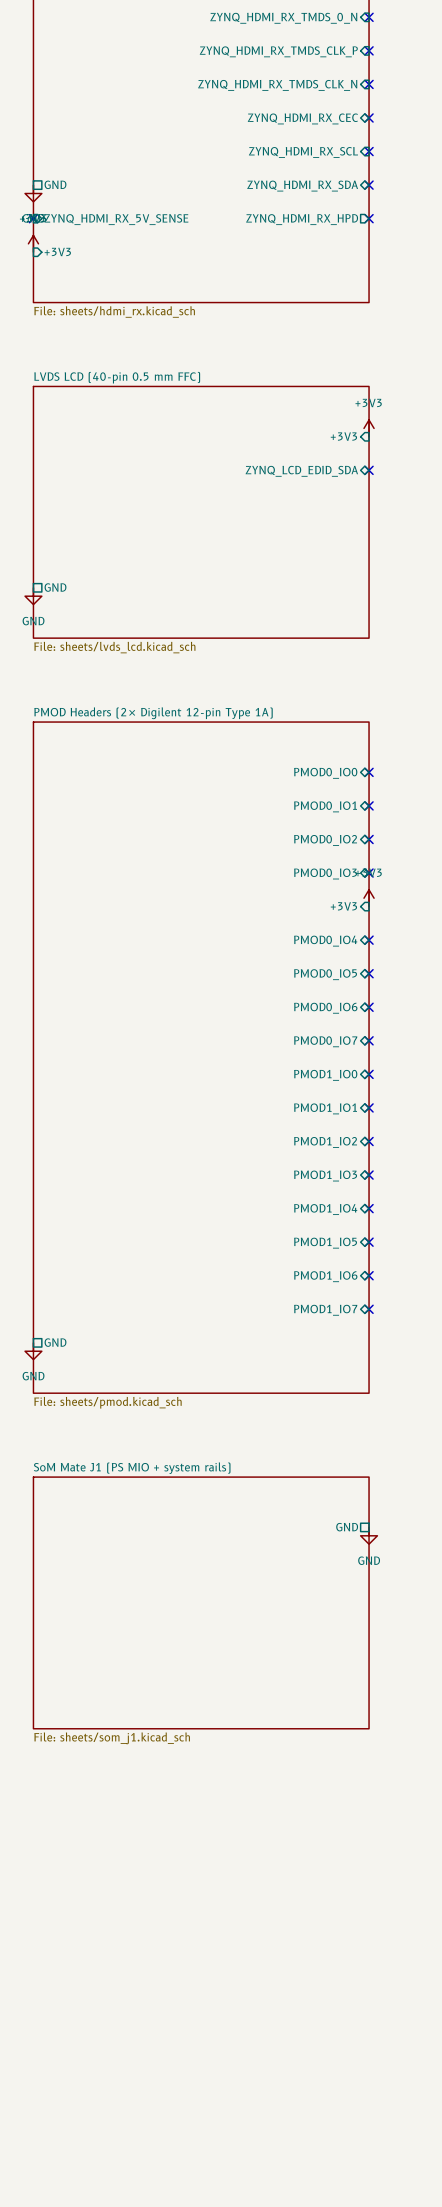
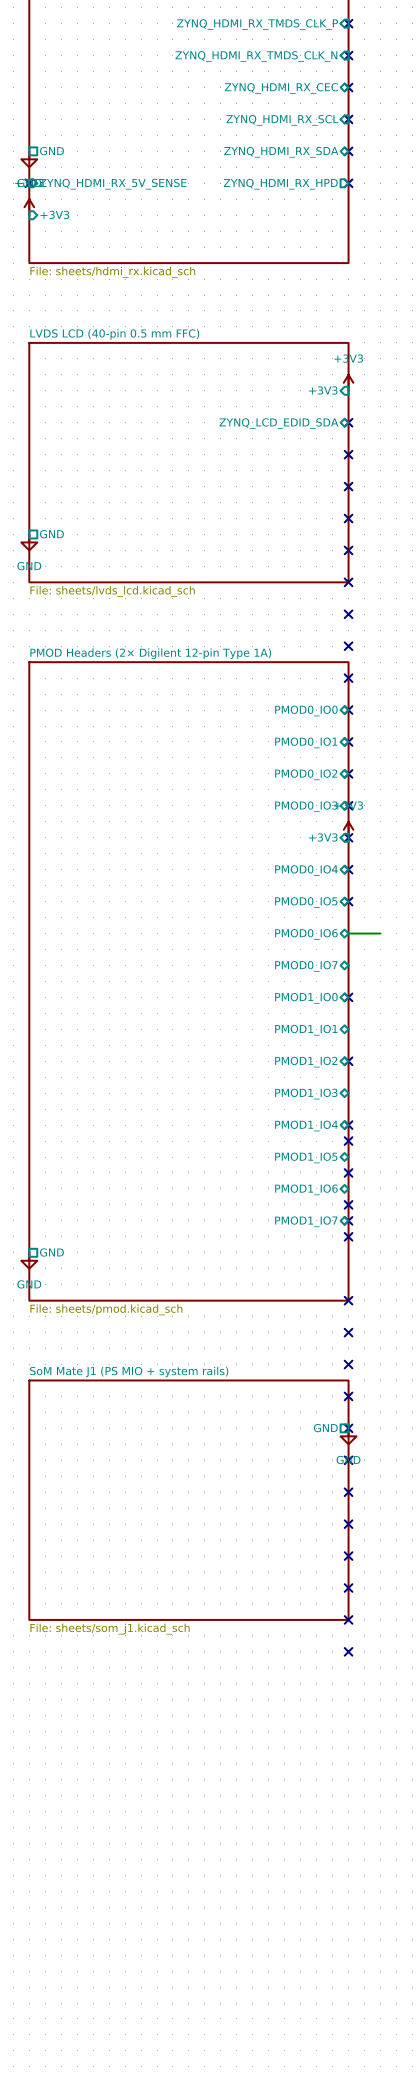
no-connect mark: none -> (348, 454)
no-connect mark: none -> (348, 486)
no-connect mark: none -> (348, 518)
no-connect mark: none -> (348, 550)
no-connect mark: none -> (348, 582)
no-connect mark: none -> (348, 614)
no-connect mark: none -> (348, 646)
no-connect mark: none -> (348, 678)
no-connect mark: none -> (348, 837)
wire: none -> (348, 933) (380, 933)
no-connect mark: (369, 1007) -> none
no-connect mark: (369, 1040) -> none
no-connect mark: (369, 1107) -> none
no-connect mark: (369, 1175) -> none
no-connect mark: none -> (348, 1141)
no-connect mark: (369, 1242) -> none
no-connect mark: none -> (348, 1172)
no-connect mark: (369, 1275) -> none
no-connect mark: none -> (348, 1204)
no-connect mark: none -> (348, 1236)
no-connect mark: none -> (348, 1300)
no-connect mark: none -> (348, 1332)
no-connect mark: none -> (348, 1364)
no-connect mark: none -> (348, 1396)
no-connect mark: none -> (348, 1428)
no-connect mark: none -> (348, 1460)
no-connect mark: none -> (348, 1492)
no-connect mark: none -> (348, 1524)
no-connect mark: none -> (348, 1556)
no-connect mark: none -> (348, 1588)
no-connect mark: none -> (348, 1619)
no-connect mark: none -> (348, 1651)

